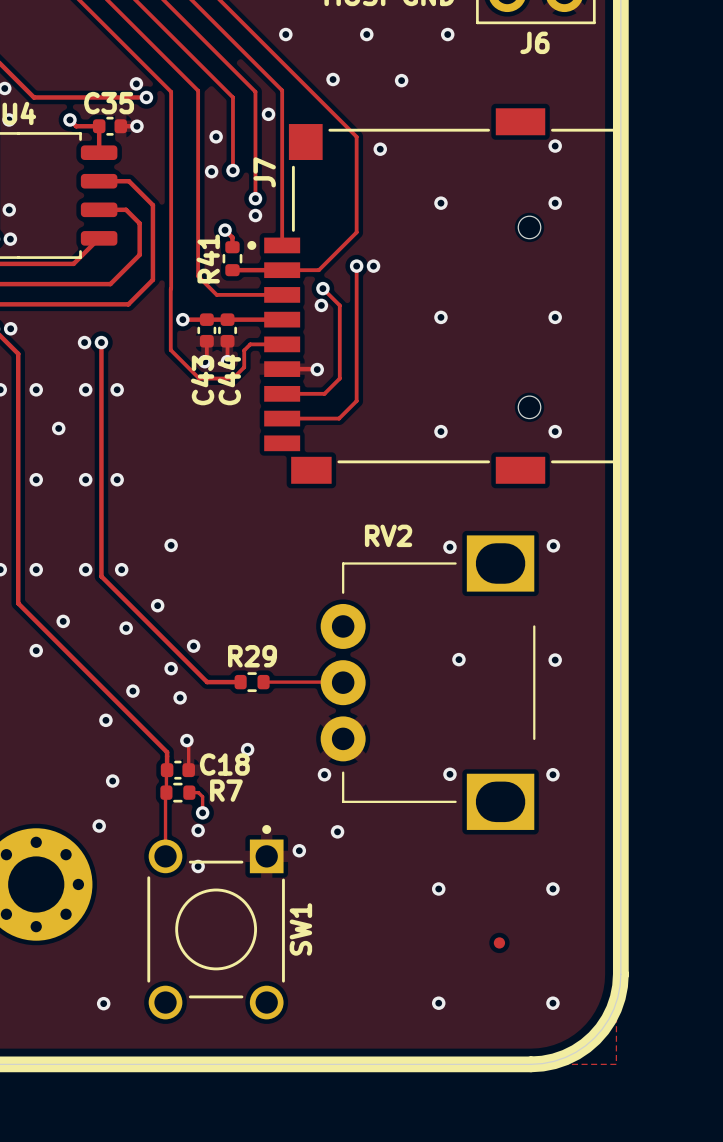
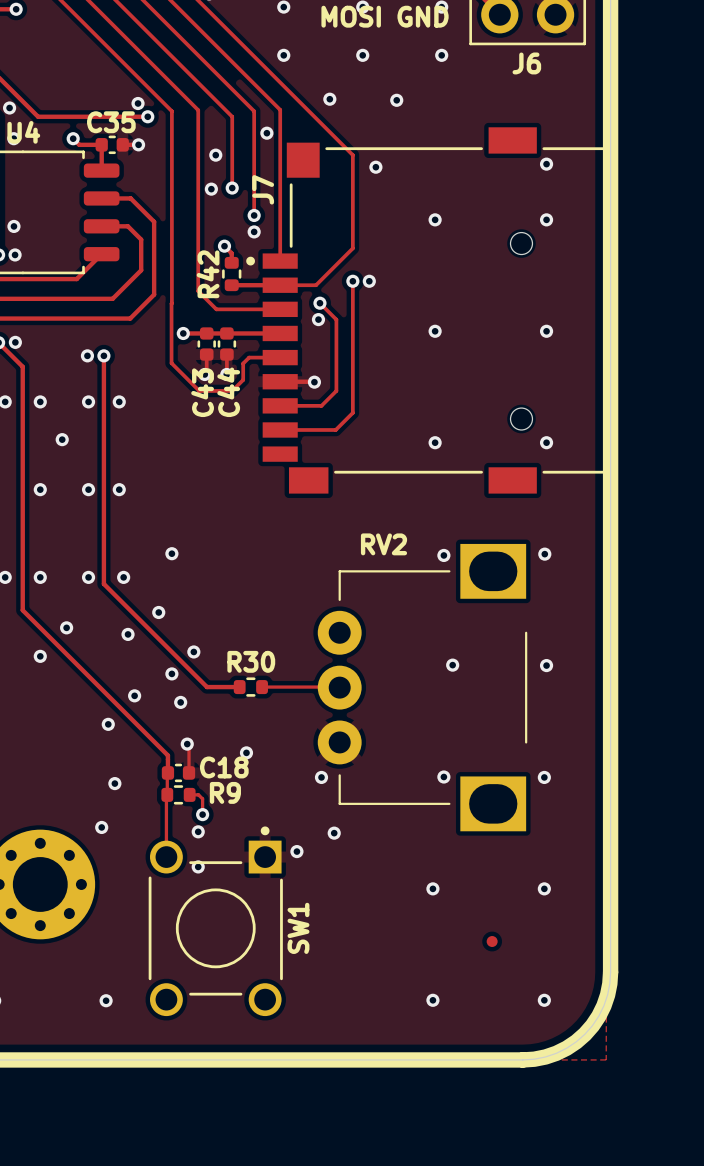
R41 name: R41 (208, 258) -> R42 (208, 274)
R29 name: R29 (252, 656) -> R30 (251, 661)
R7 name: R7 (226, 790) -> R9 (225, 792)

